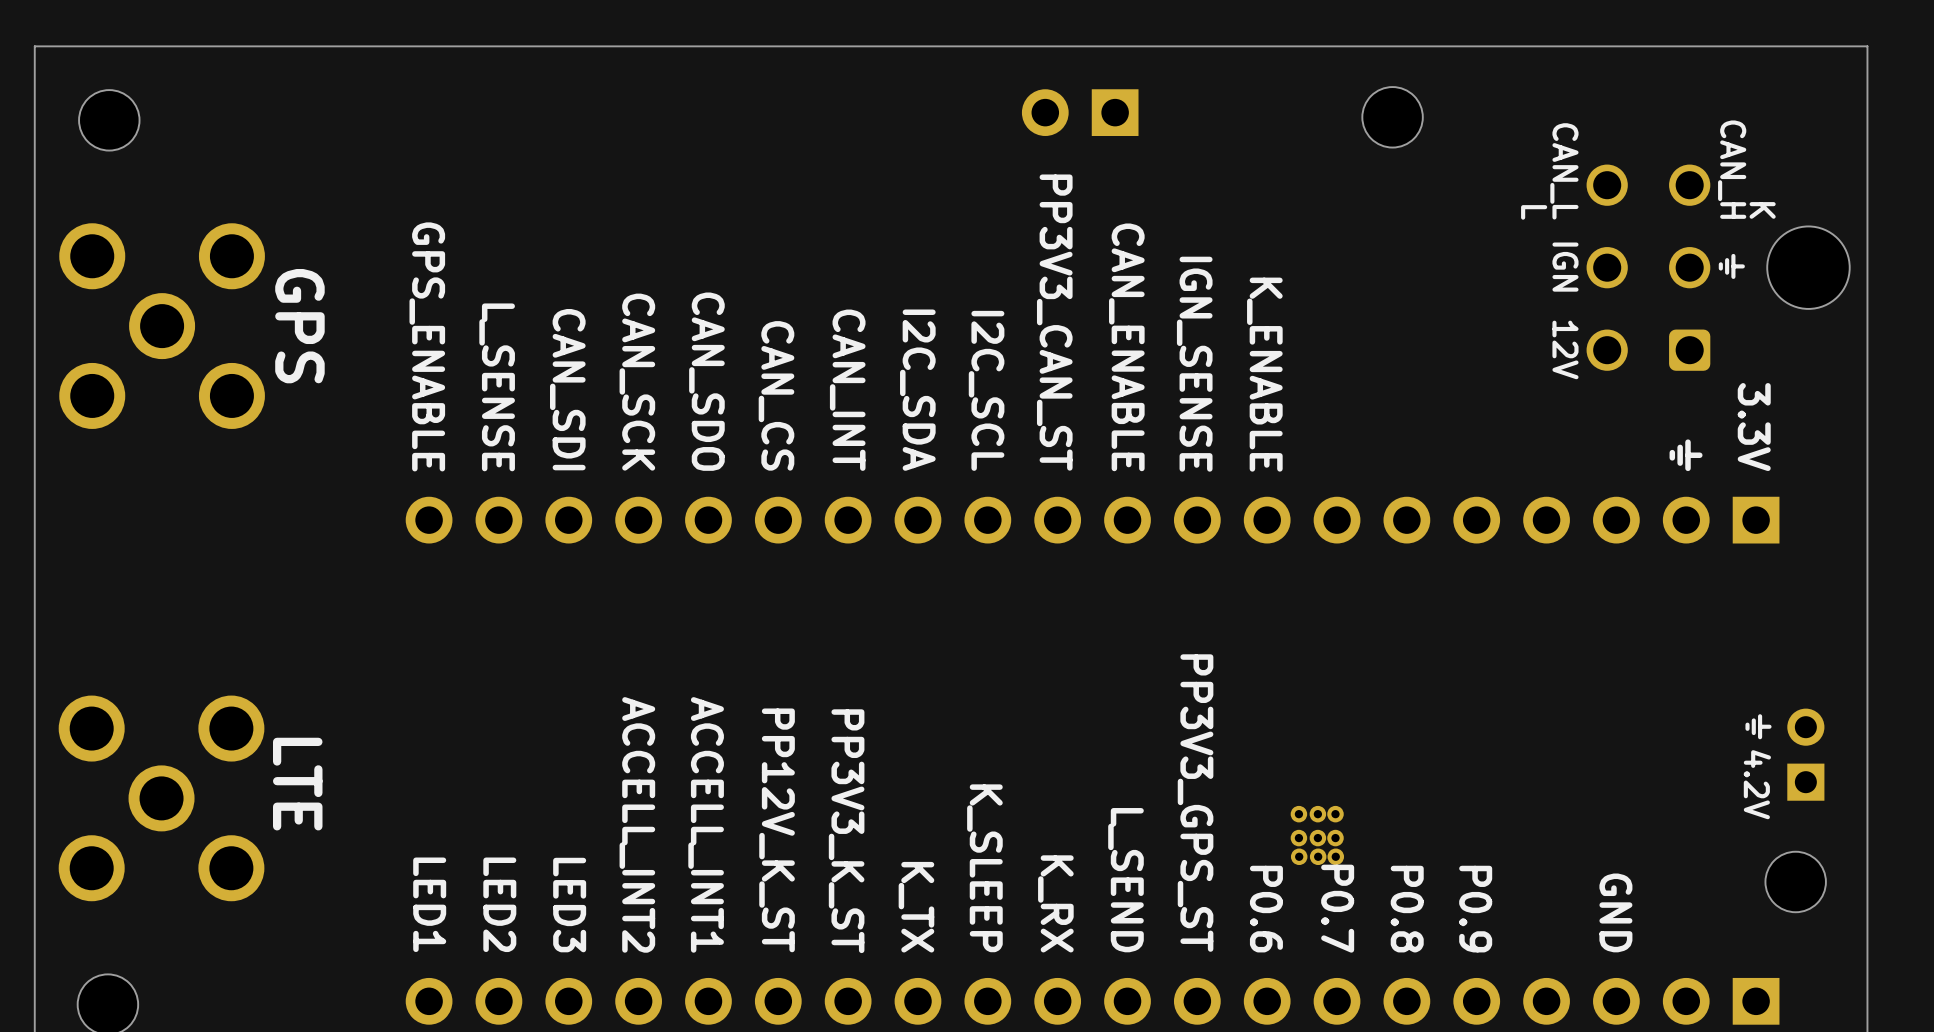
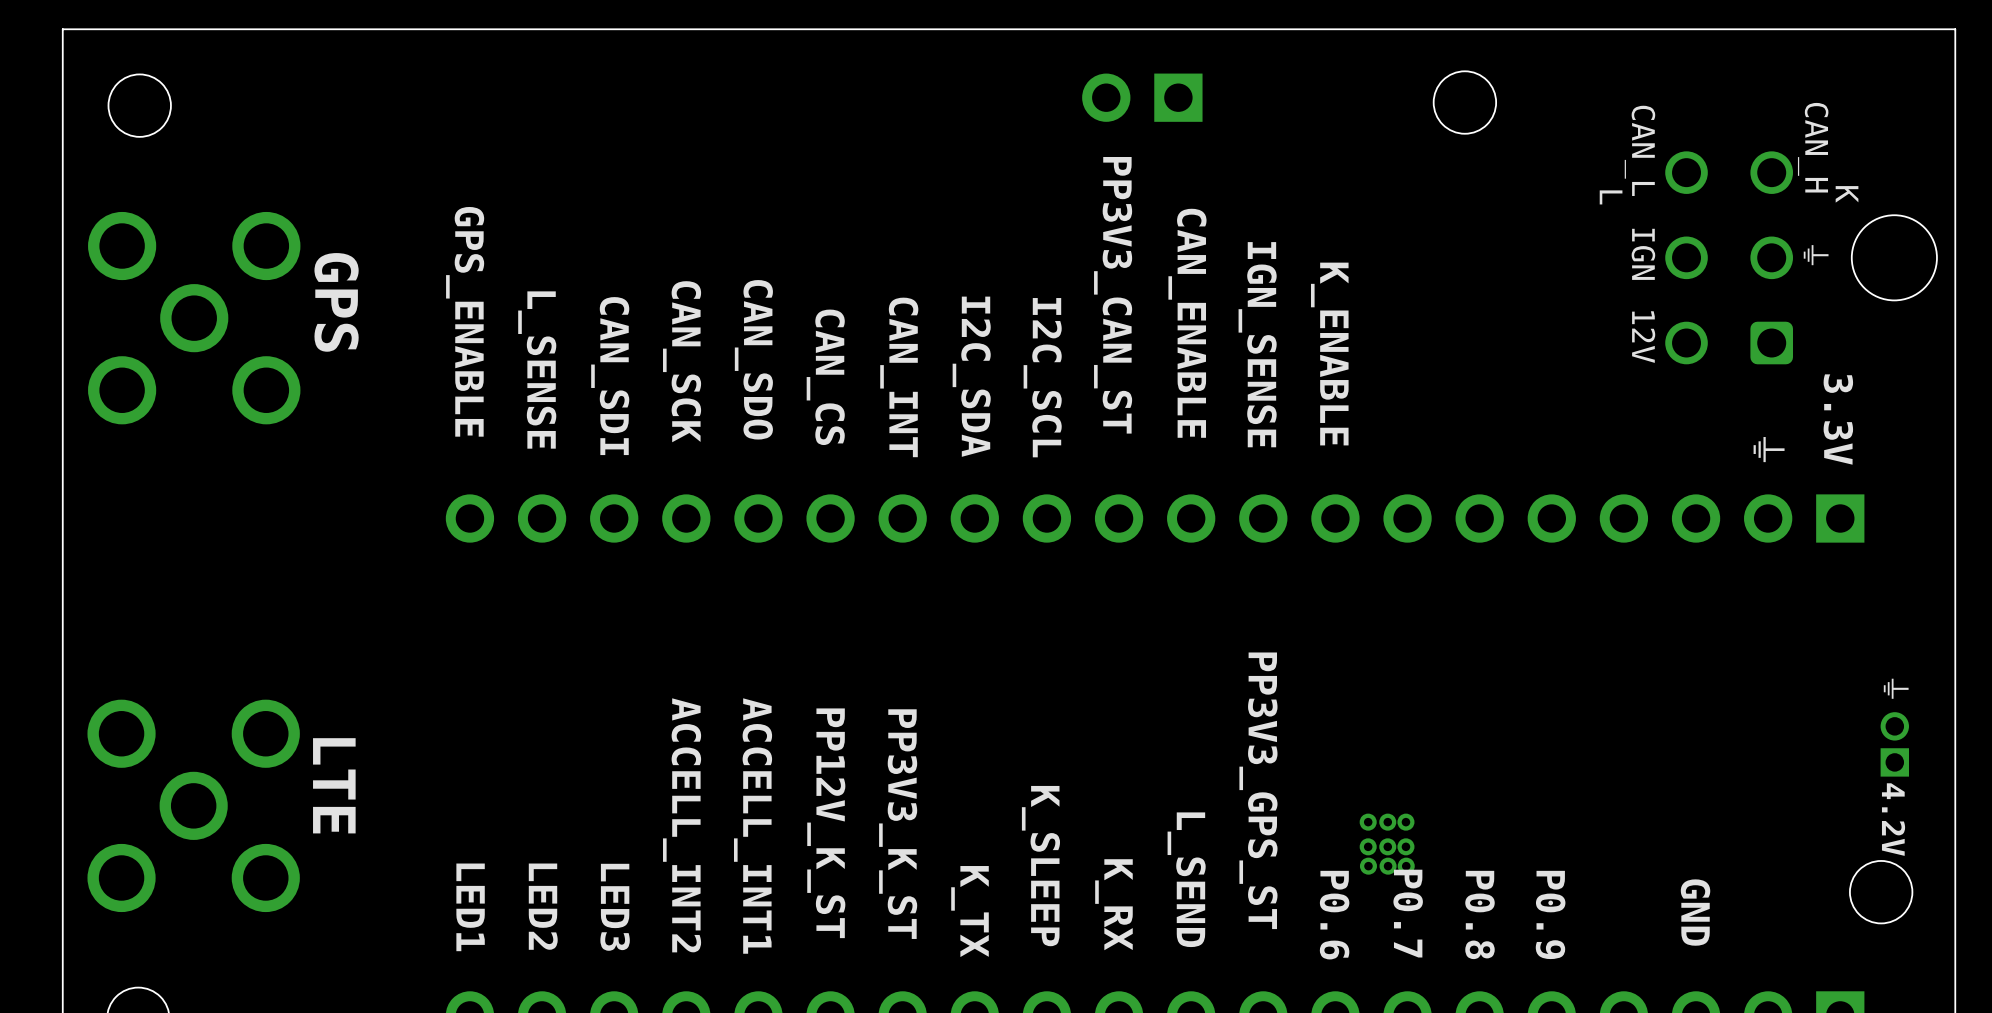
part footprint: [1787, 708, 1825, 801] -> [1880, 712, 1909, 777]
text position: ⏚ (1758, 726) -> ⏚ (1896, 688)
text position: 4.2V (1757, 784) -> 4.2V (1893, 819)

